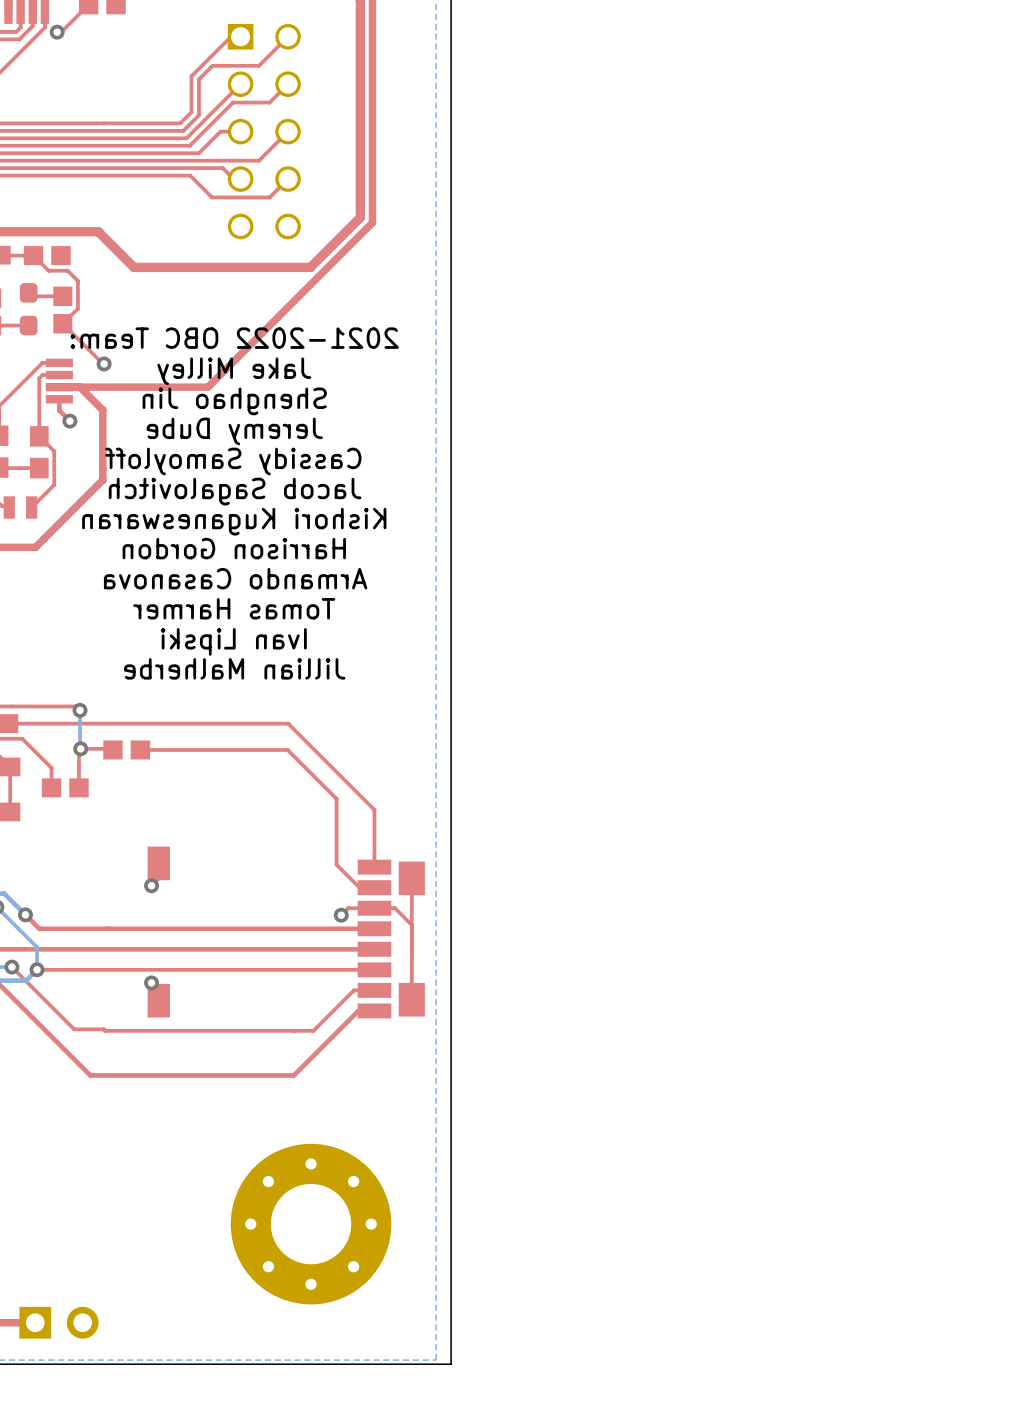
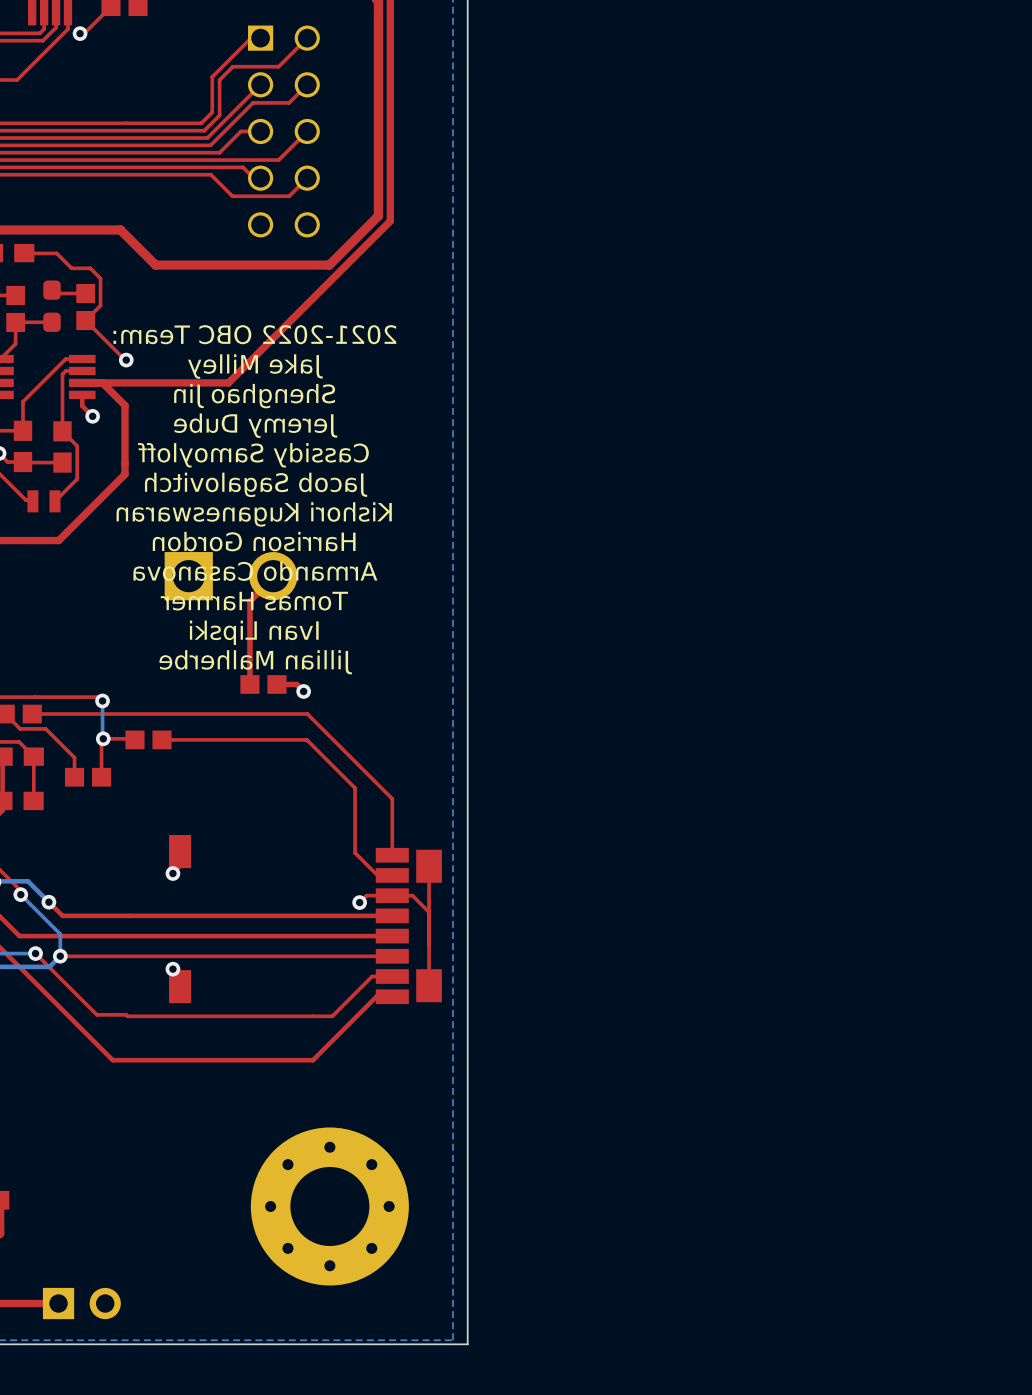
part: (47, 255) -> none
top track: none -> (280, 571) (249, 601) (249, 684)
part: none -> (231, 576)
part: none -> (263, 684)
top track: none -> (276, 684) (296, 684) (303, 691)
via: none -> (303, 691)

